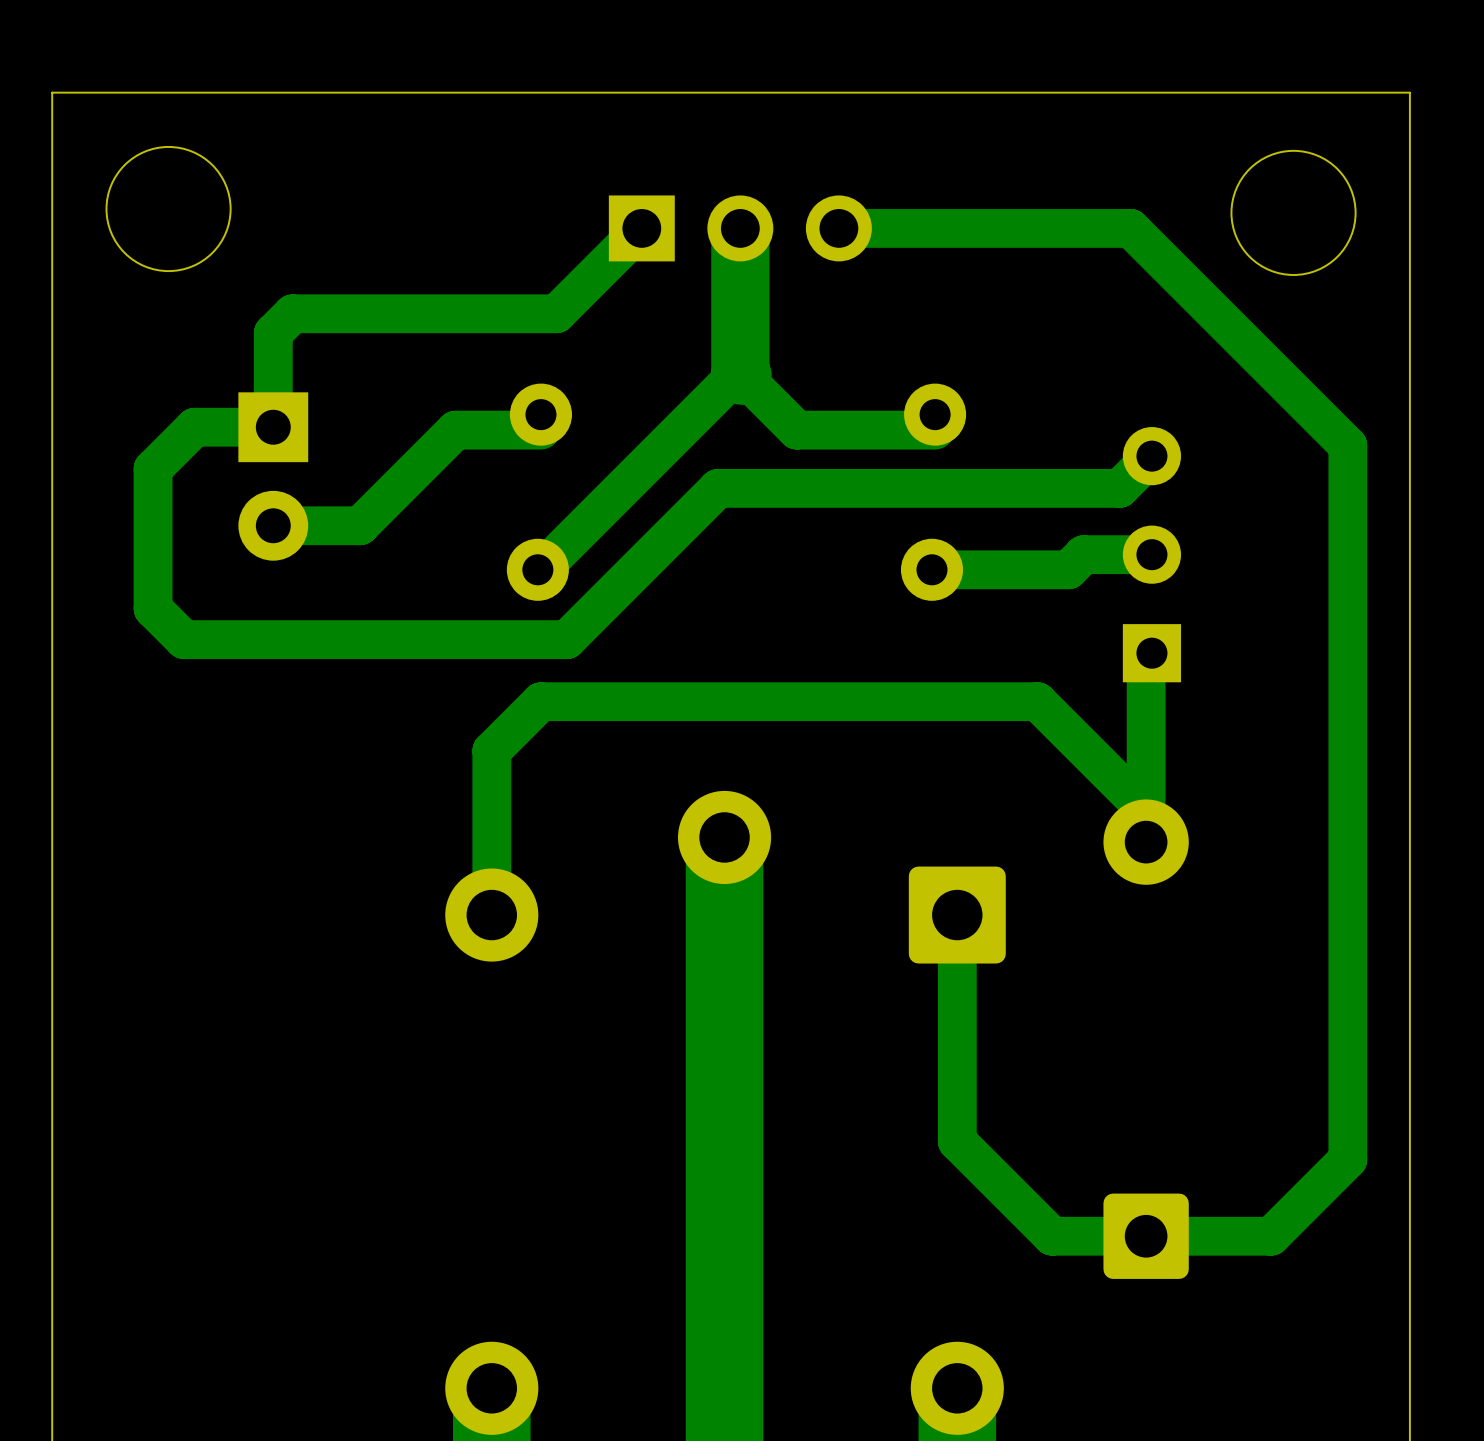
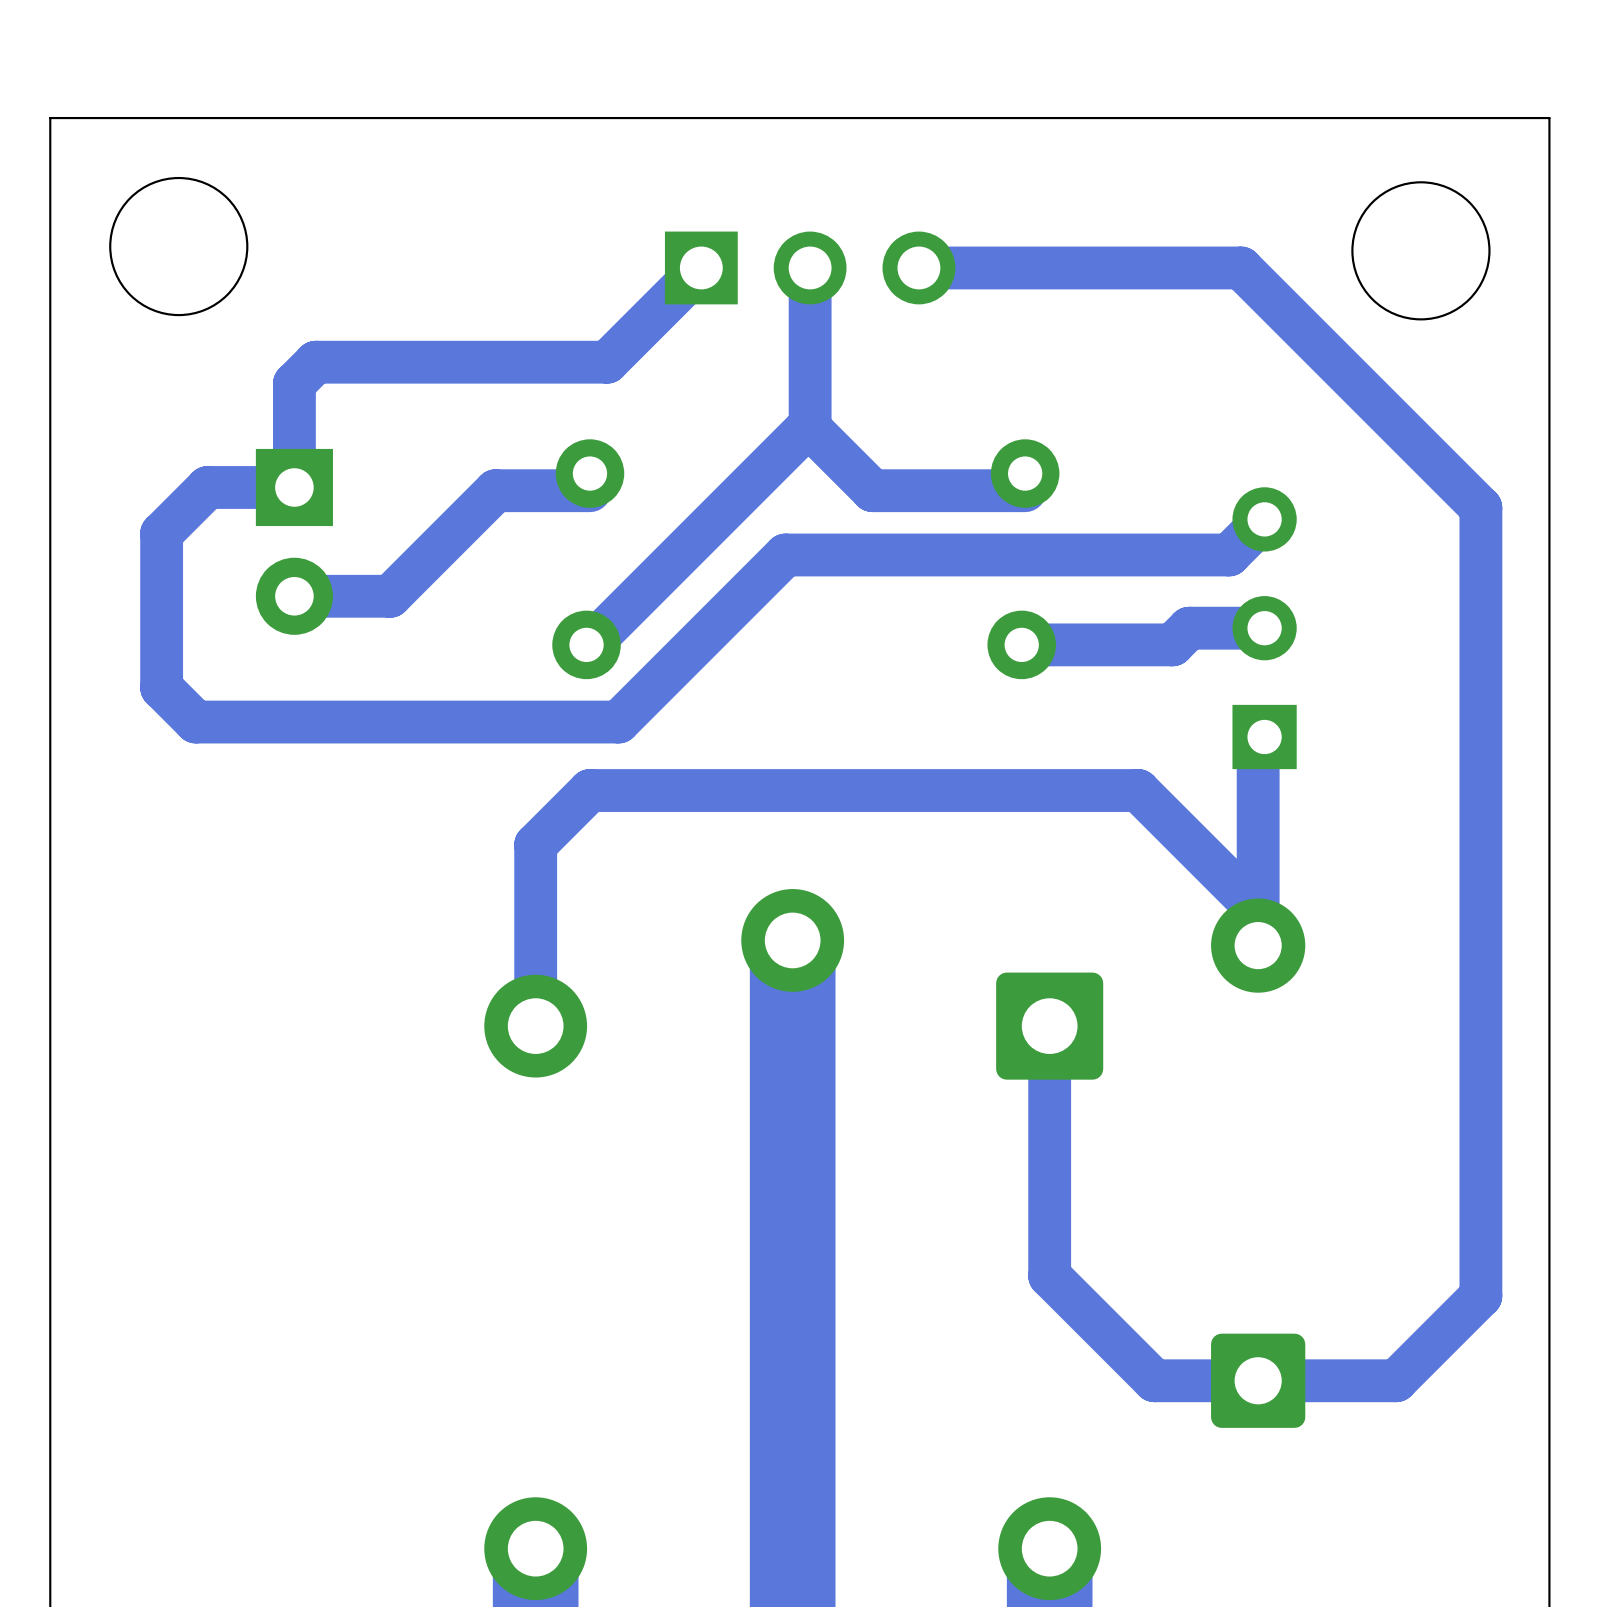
bottom track width: thick (740, 228) (740, 373) (742, 375) -> thin (810, 267) (810, 428) (812, 430)

